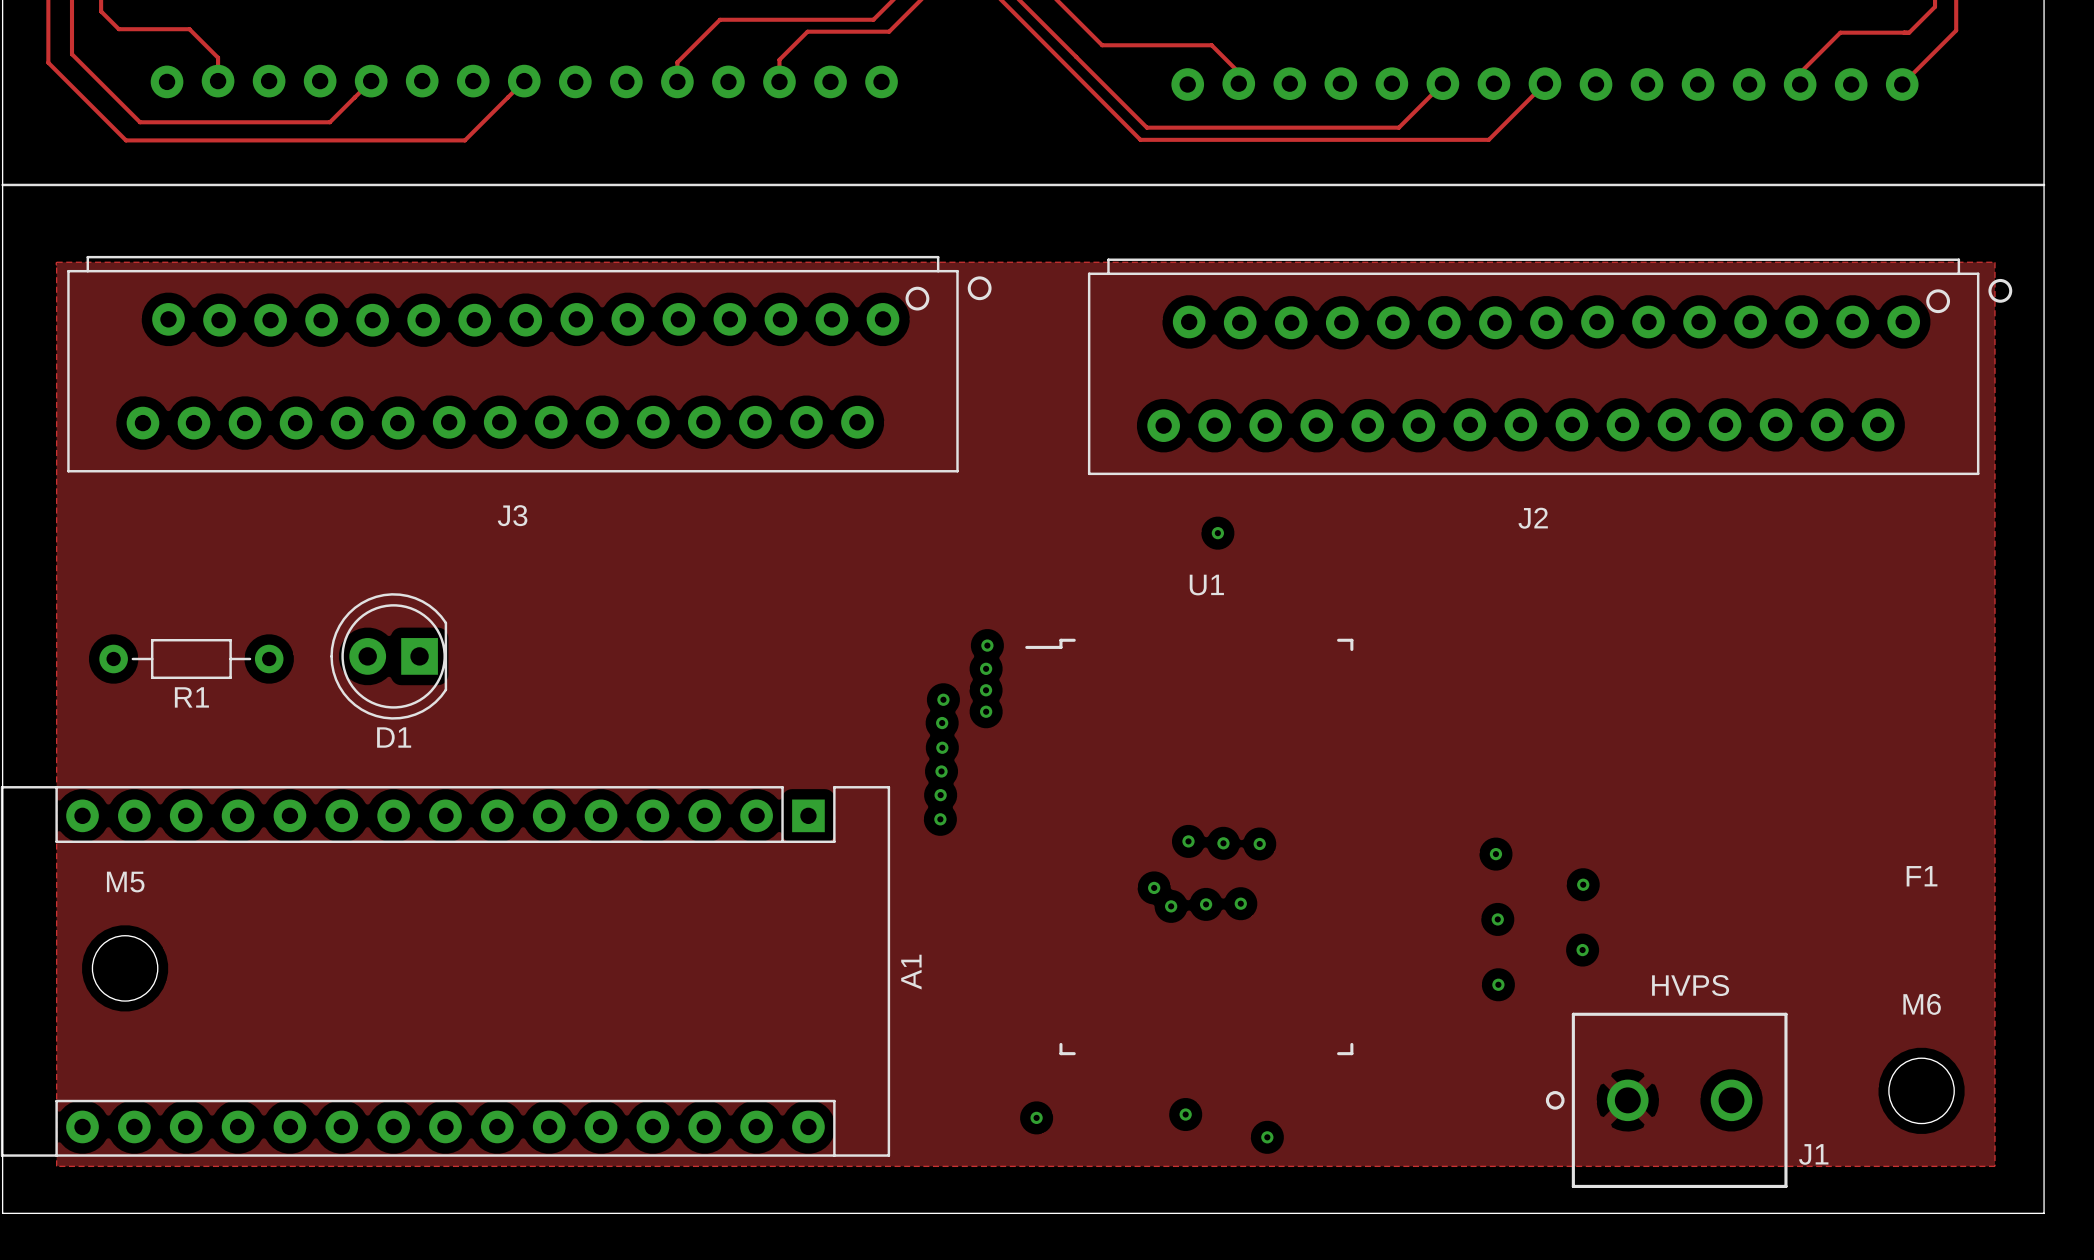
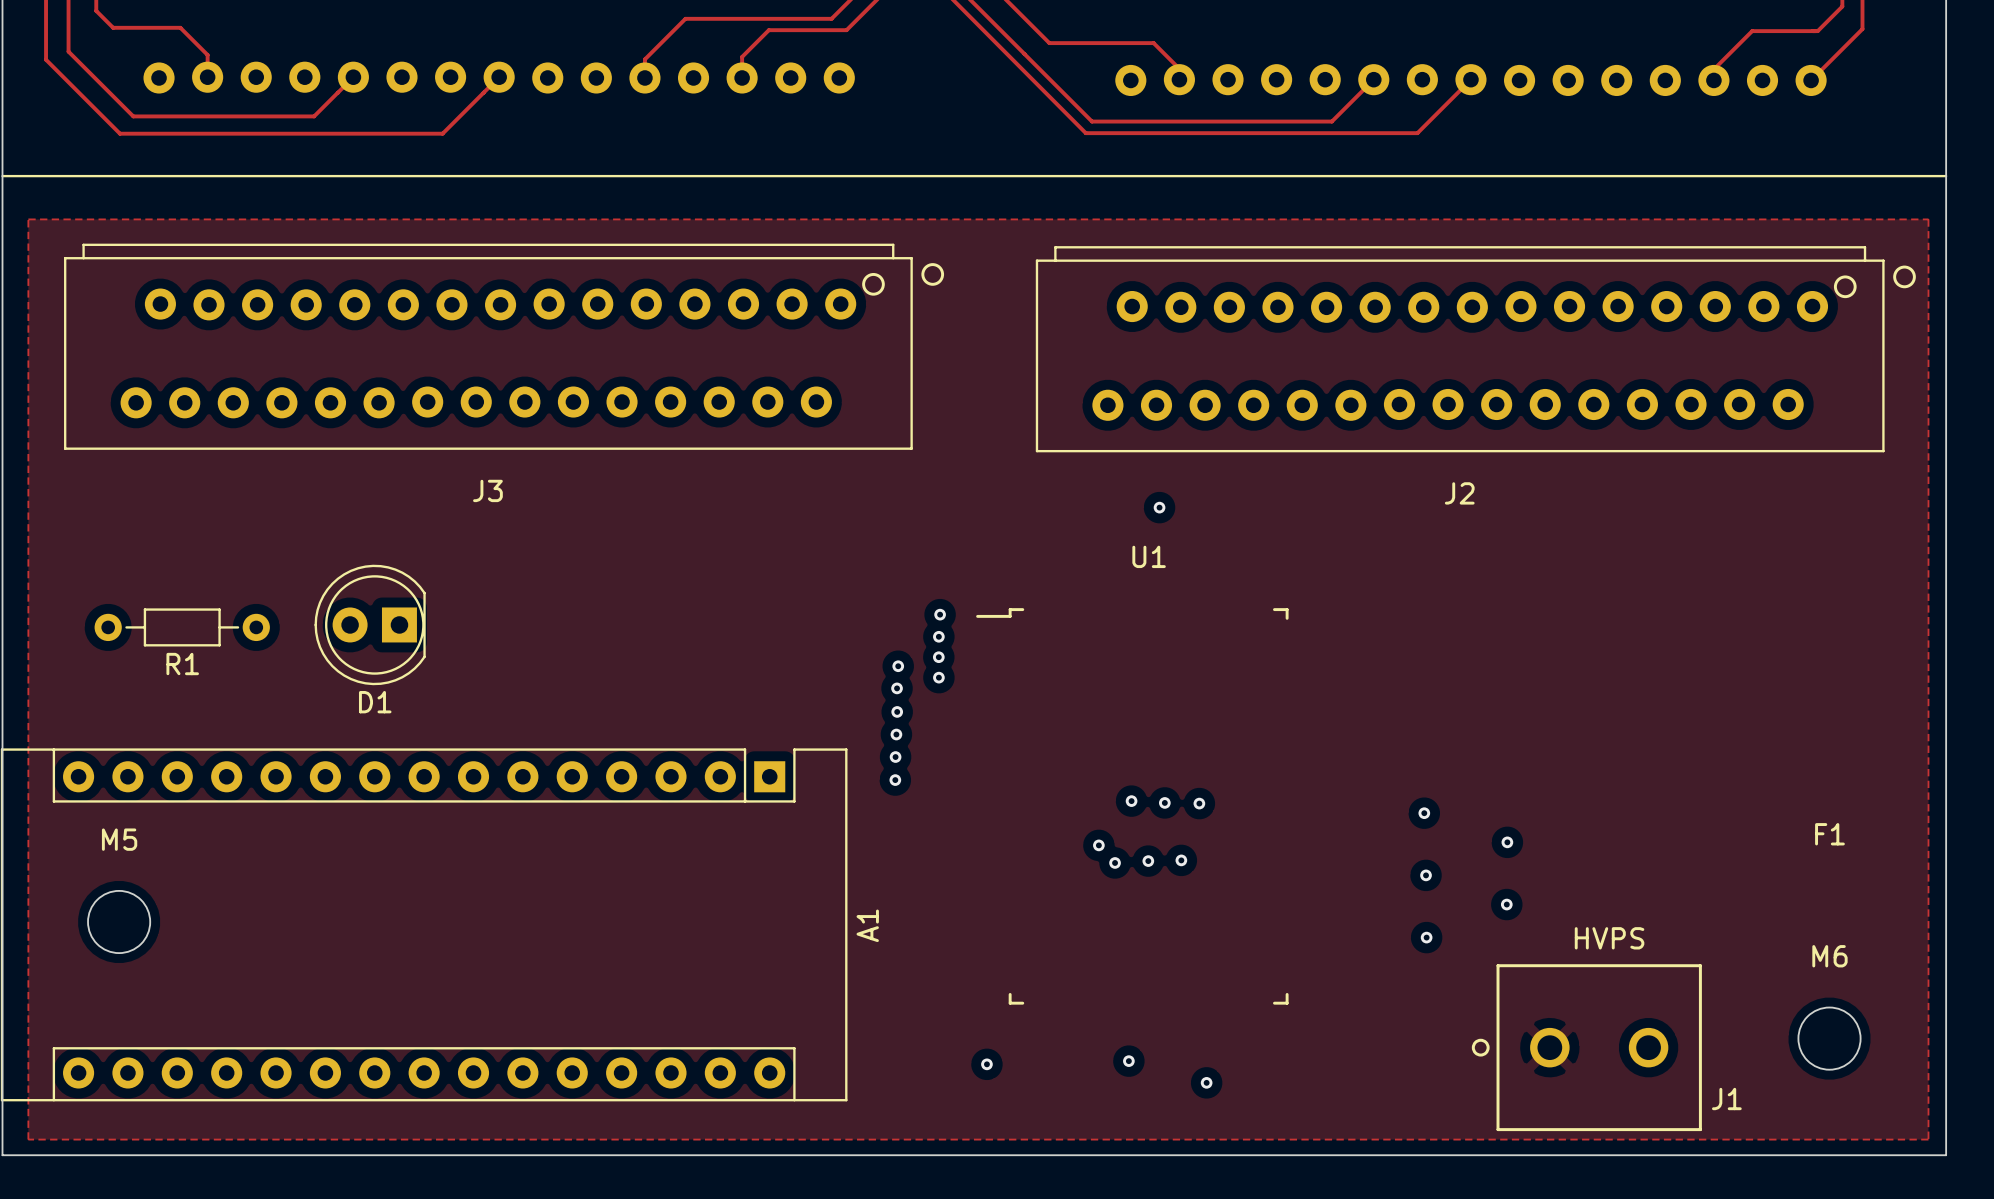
zone outline: (56, 262) (56, 1166) (1994, 1166) (1994, 262) (56, 262) -> (28, 219) (28, 1139) (1928, 1139) (1928, 219) (28, 219)

